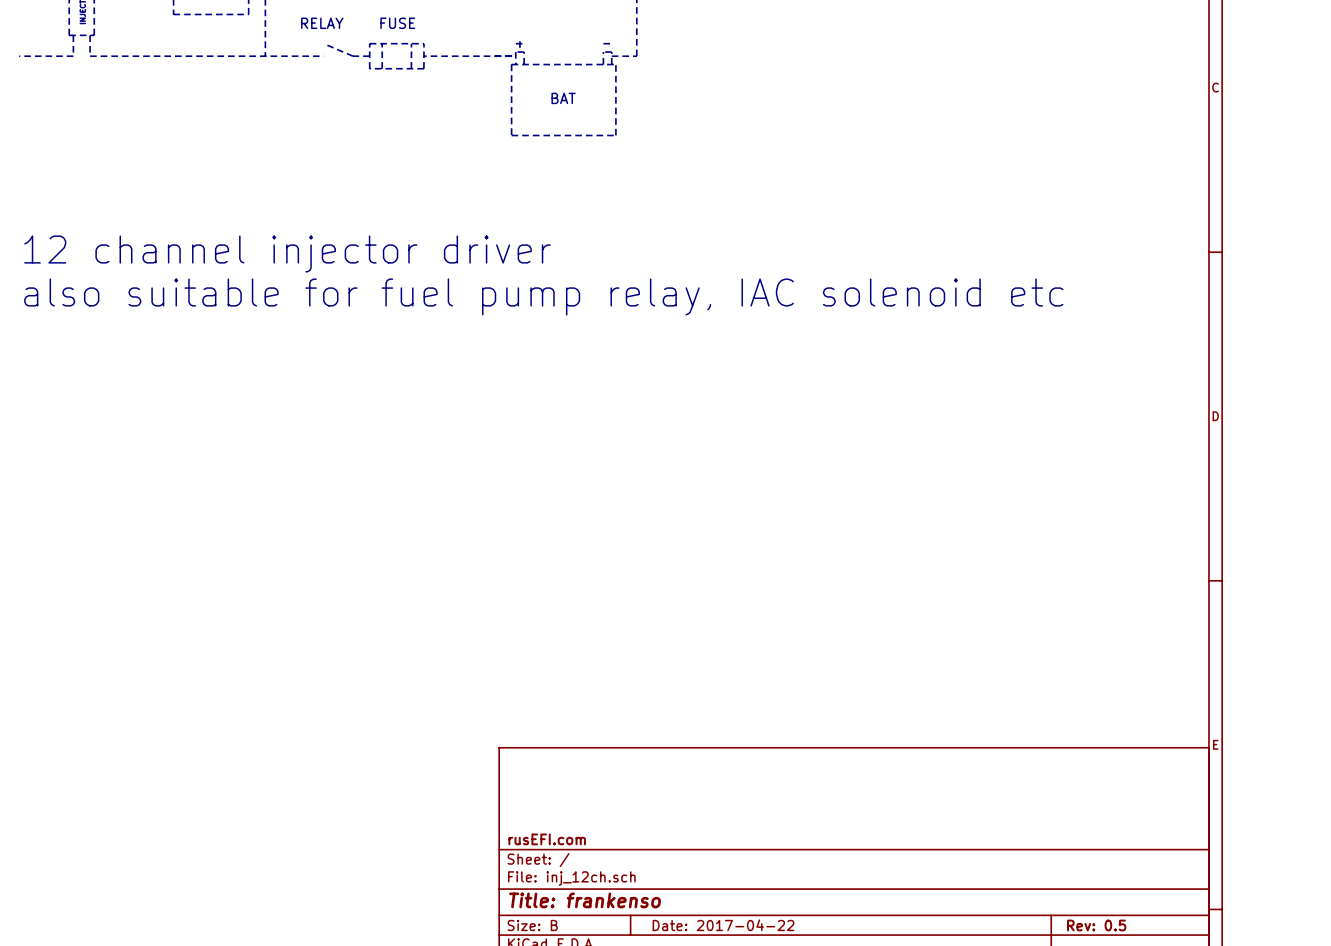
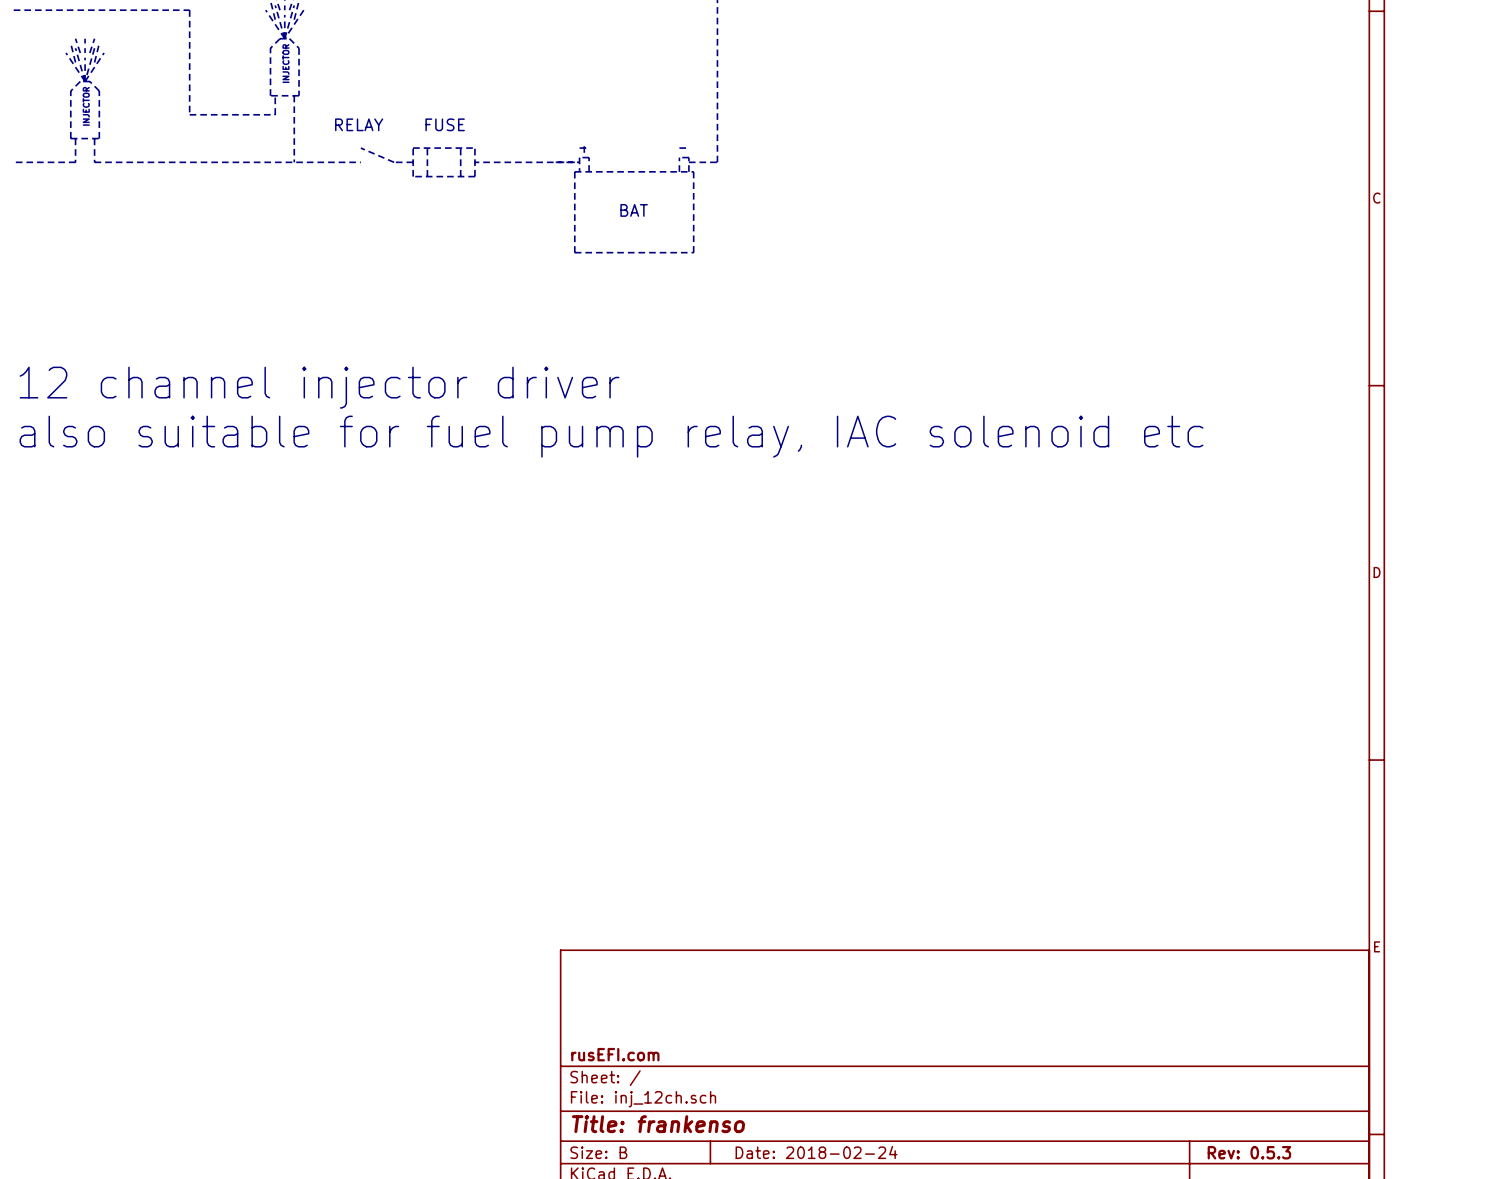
title block: Date: 2017-04-22 (723, 925) -> Date: 2018-02-24 (816, 1152)
title block: Rev: 0.5 (1096, 925) -> Rev: 0.5.3 (1249, 1152)

